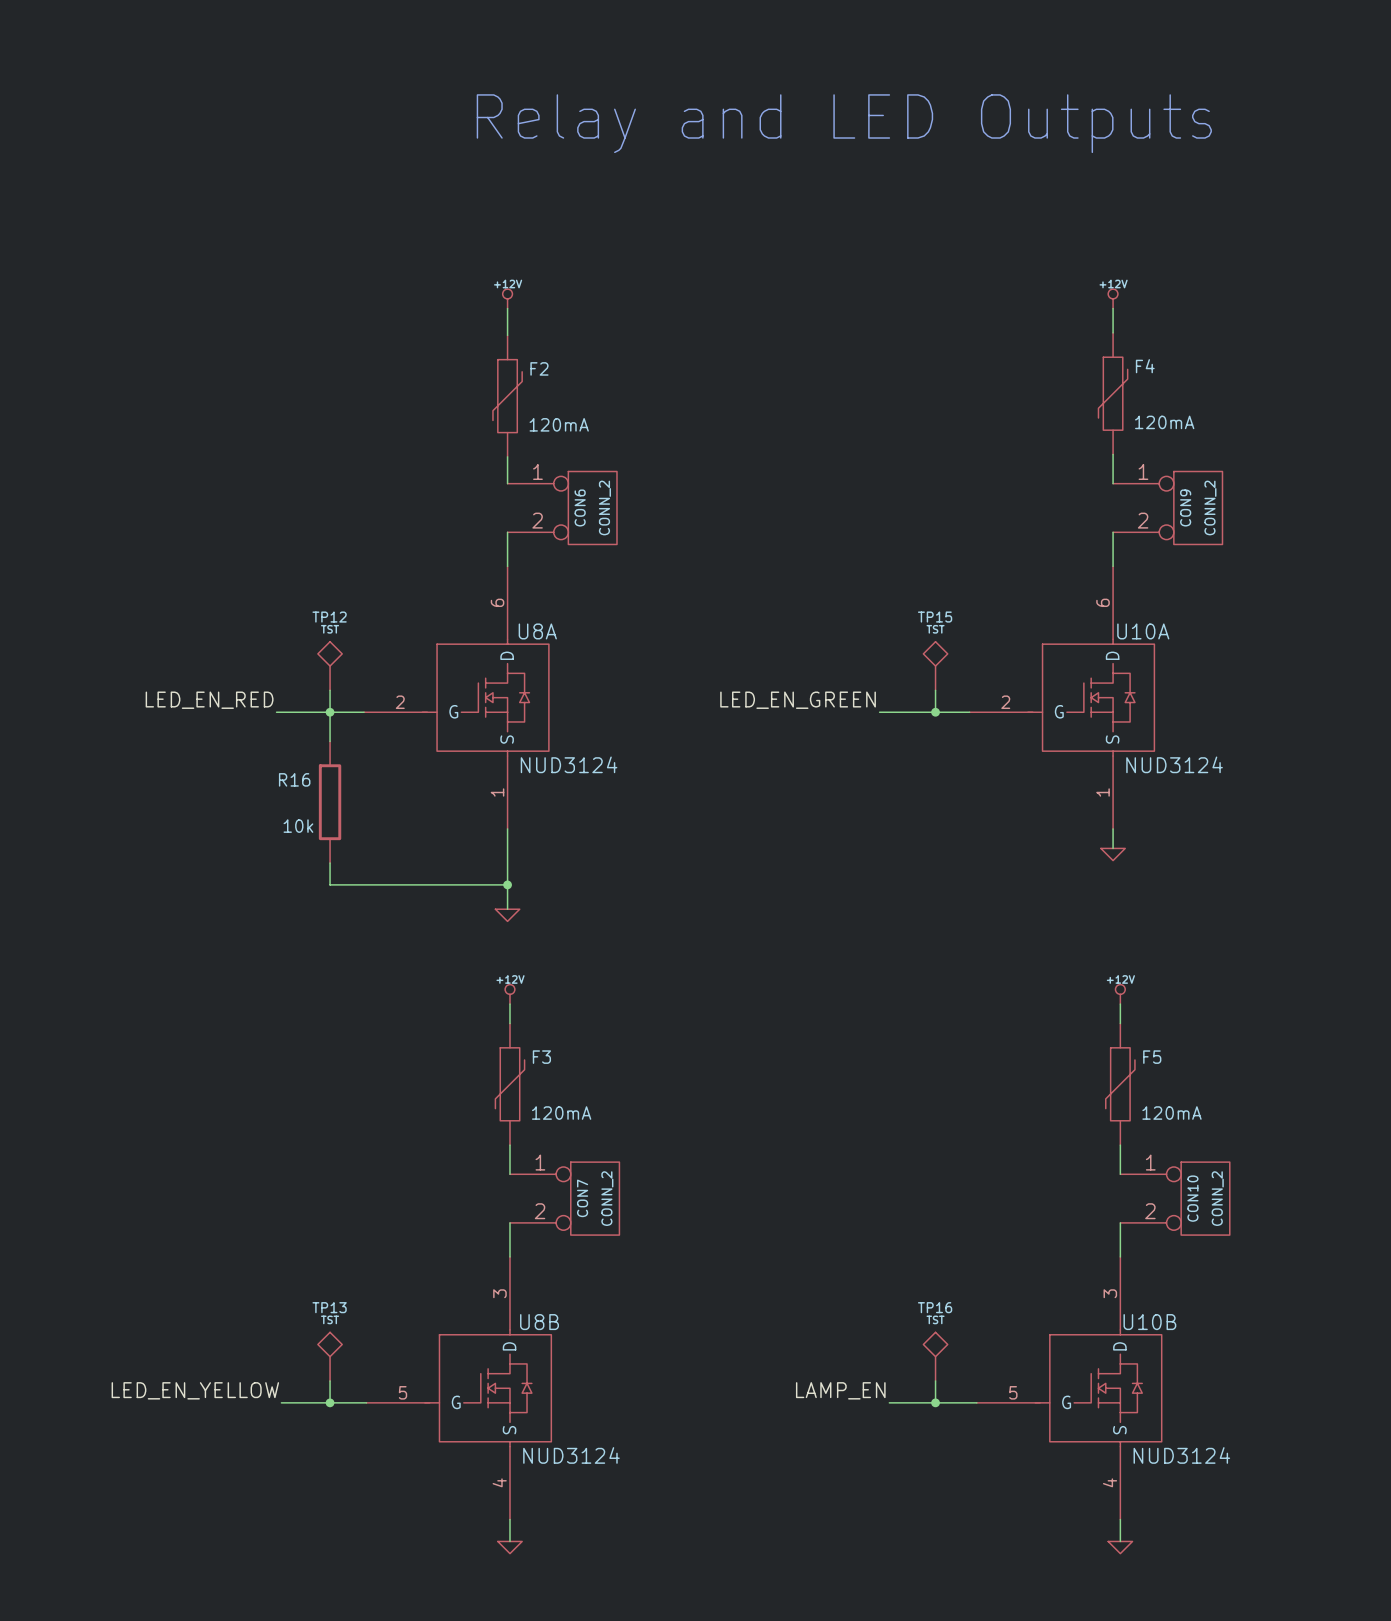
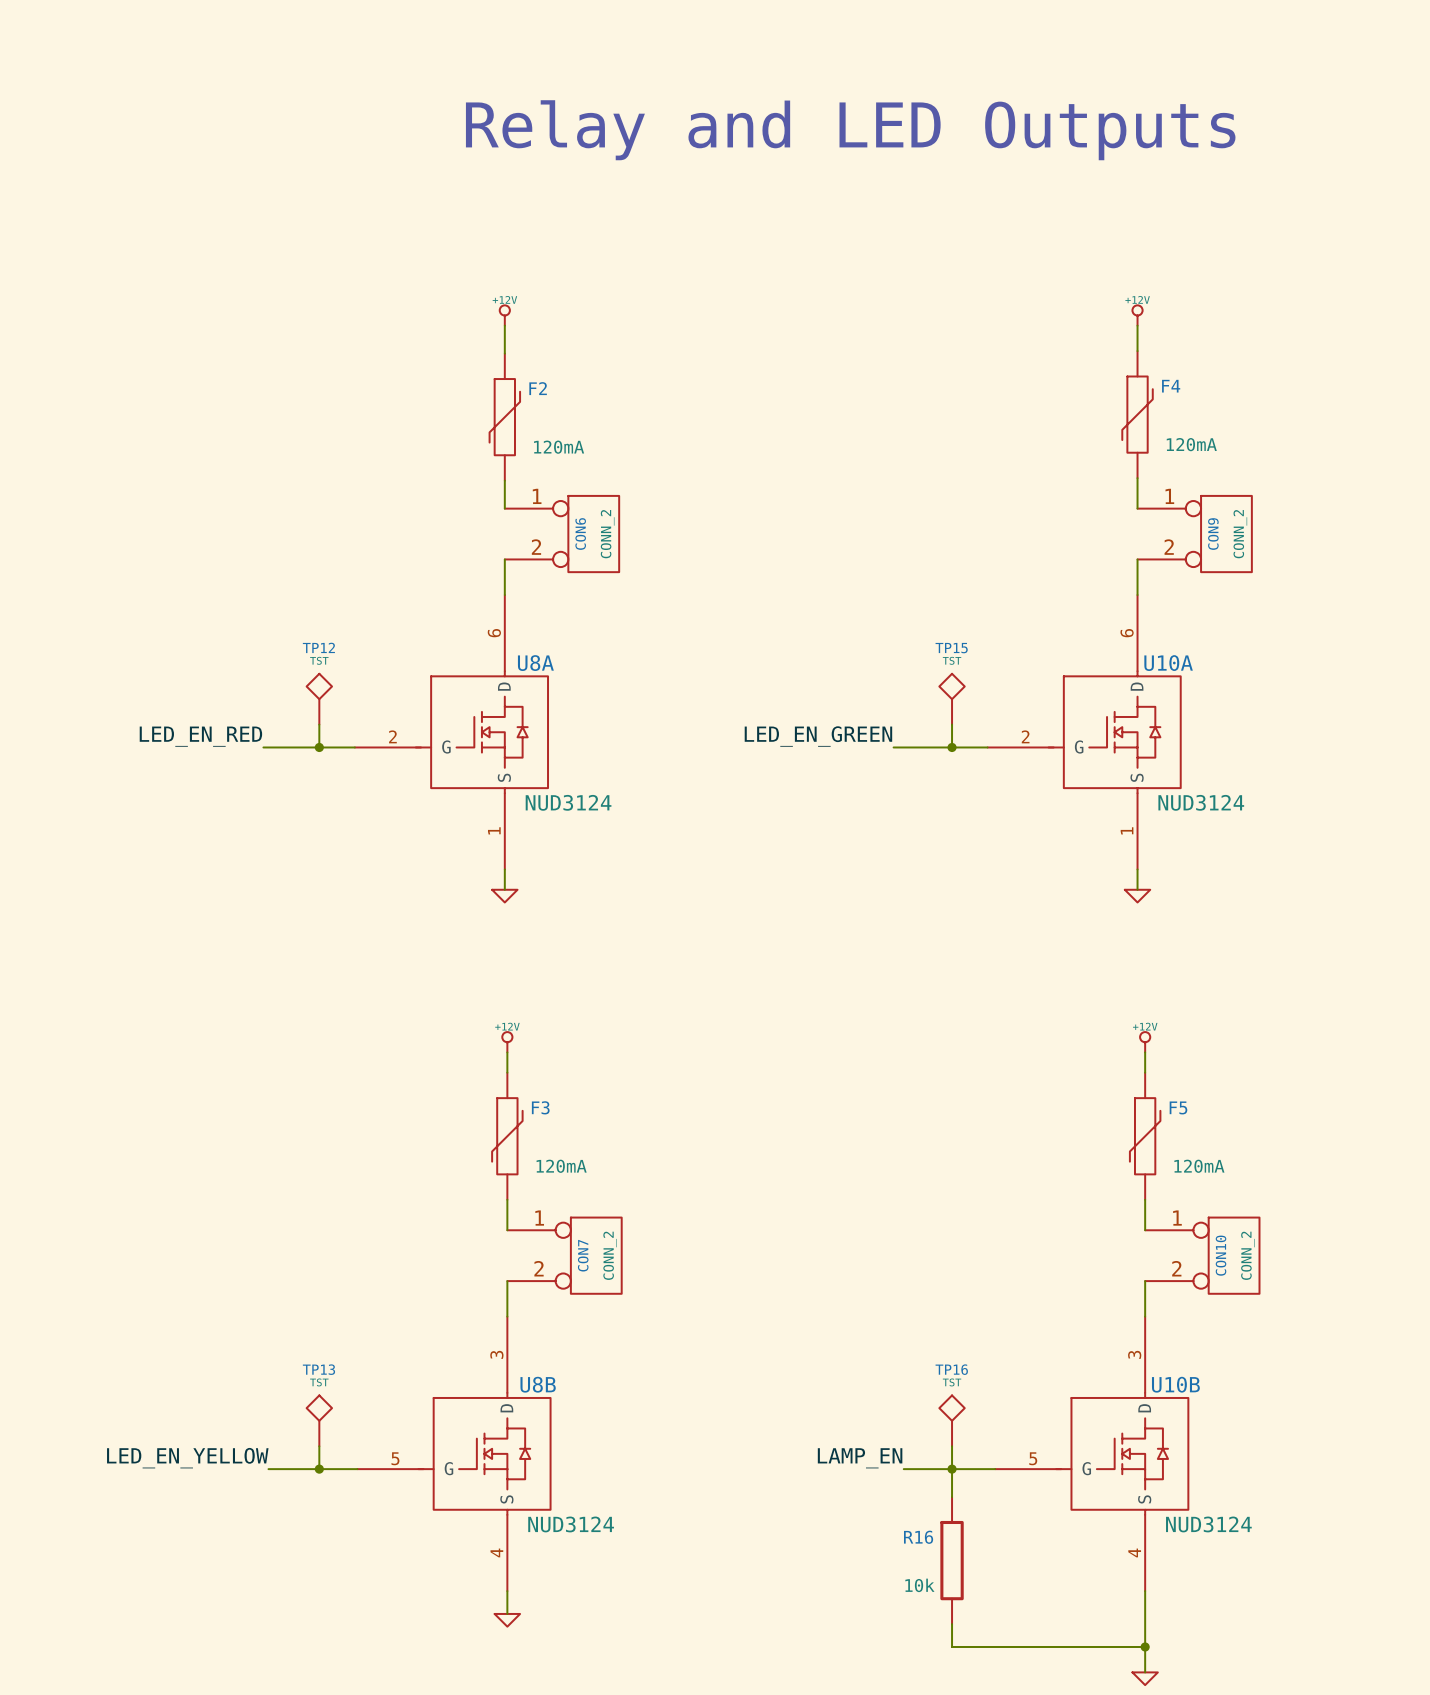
wire: (330, 712) (330, 741) -> none
R16 position: (330, 802) -> (952, 1560)
wire: (507, 848) (507, 909) -> none
wire: (330, 863) (330, 884) (507, 884) -> none
junction: (507, 884) -> none
power symbol position: (507, 915) -> (504, 896)
wire: none -> (952, 1469) (952, 1497)
wire: none -> (1145, 1613) (1145, 1672)
power symbol position: (1120, 1547) -> (1145, 1678)
wire: none -> (952, 1624) (952, 1646) (1145, 1646)
junction: none -> (1145, 1646)

